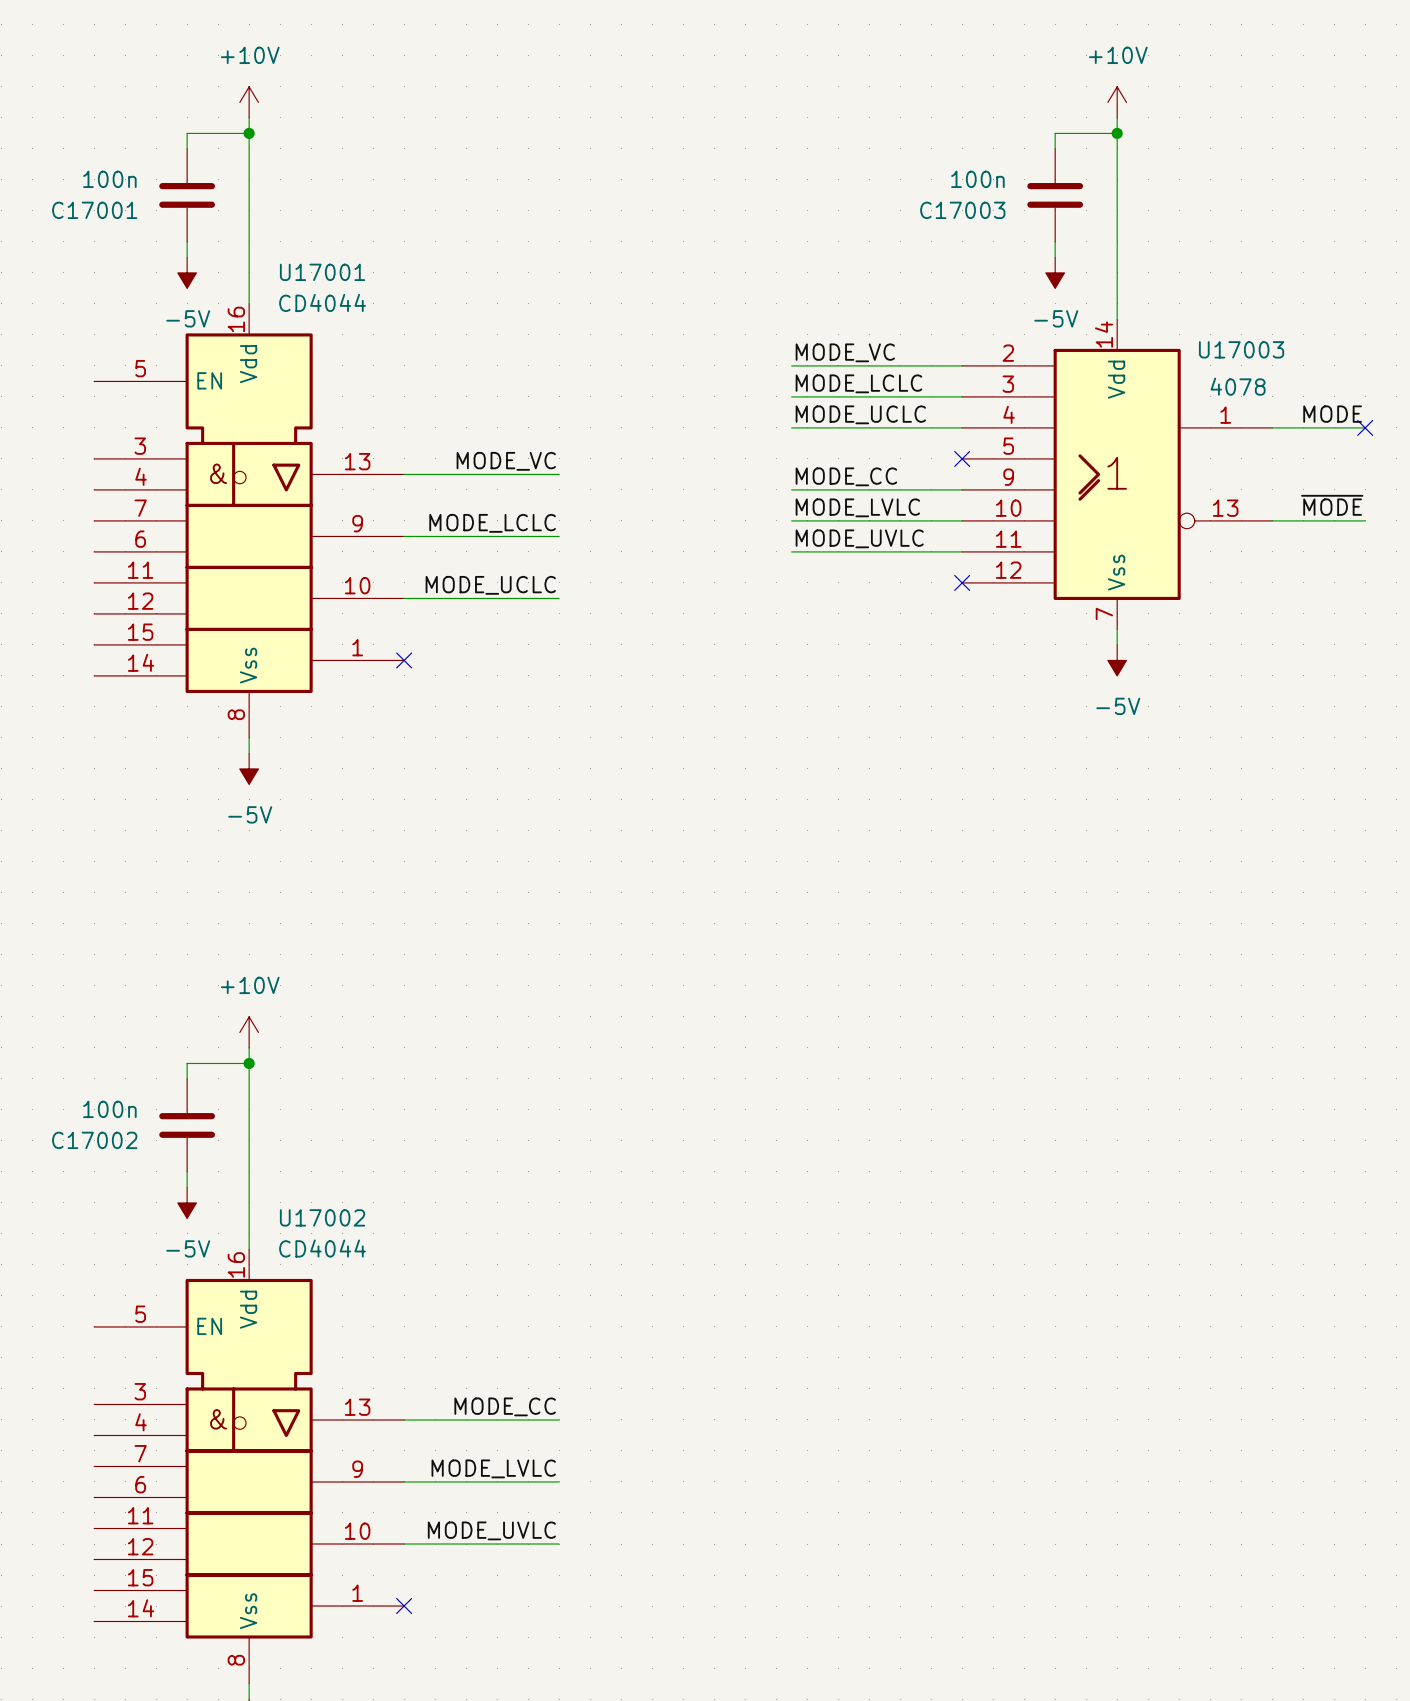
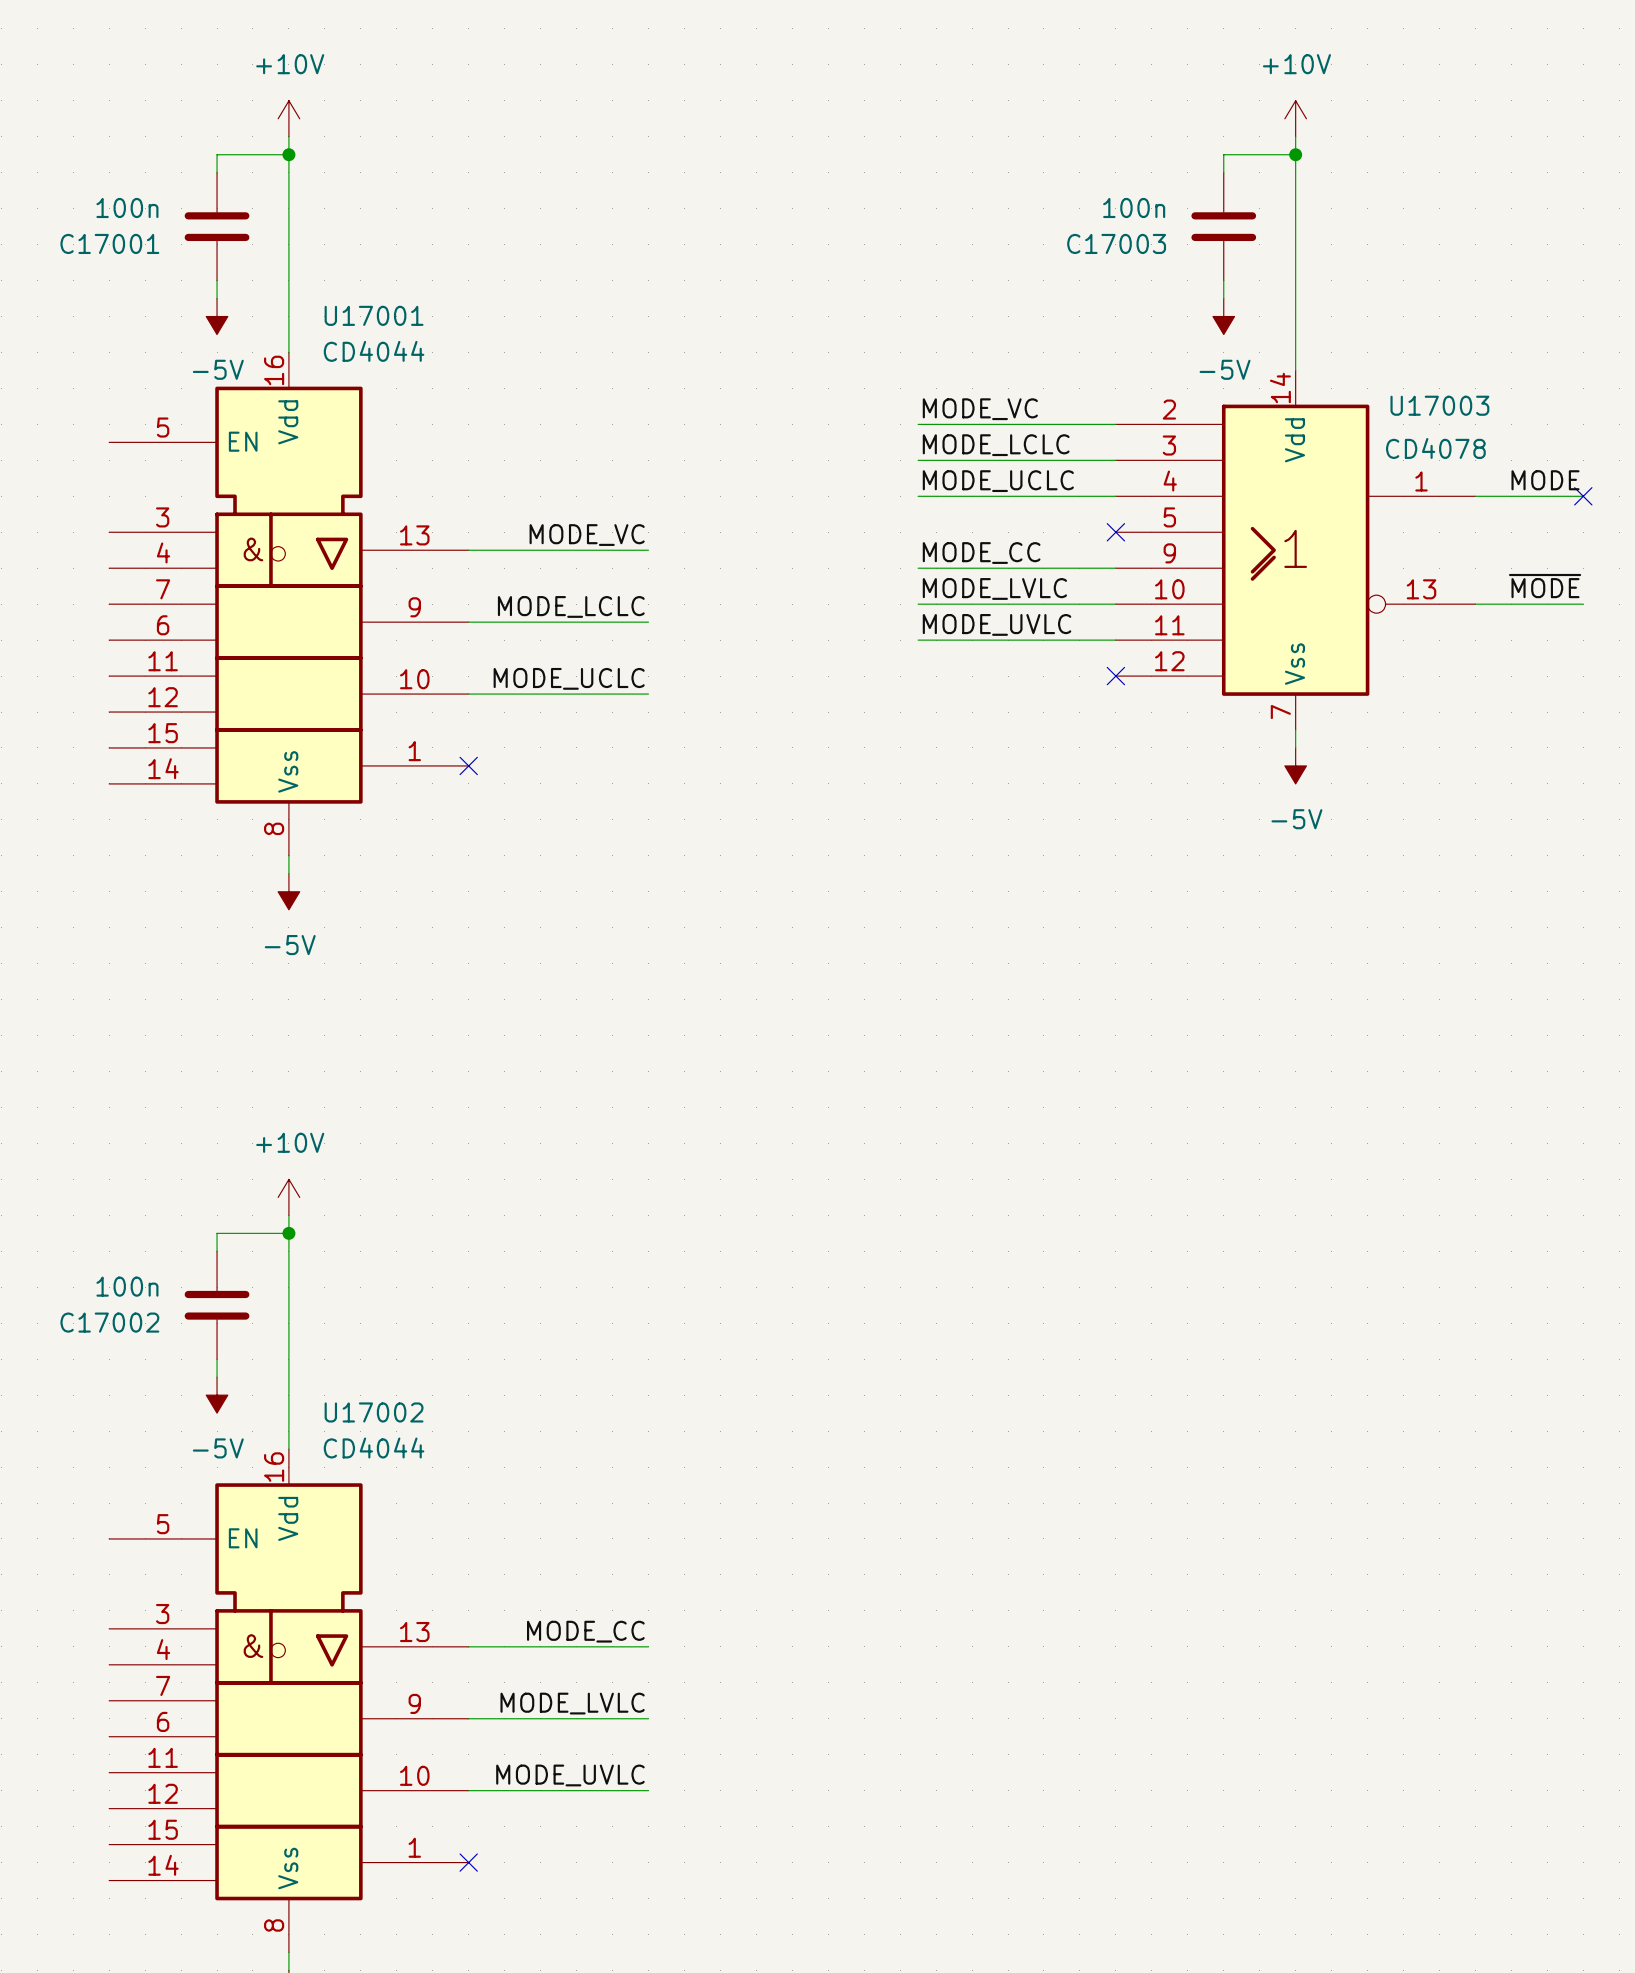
U17003 value: 4078 (1238, 386) -> CD4078 (1435, 448)

